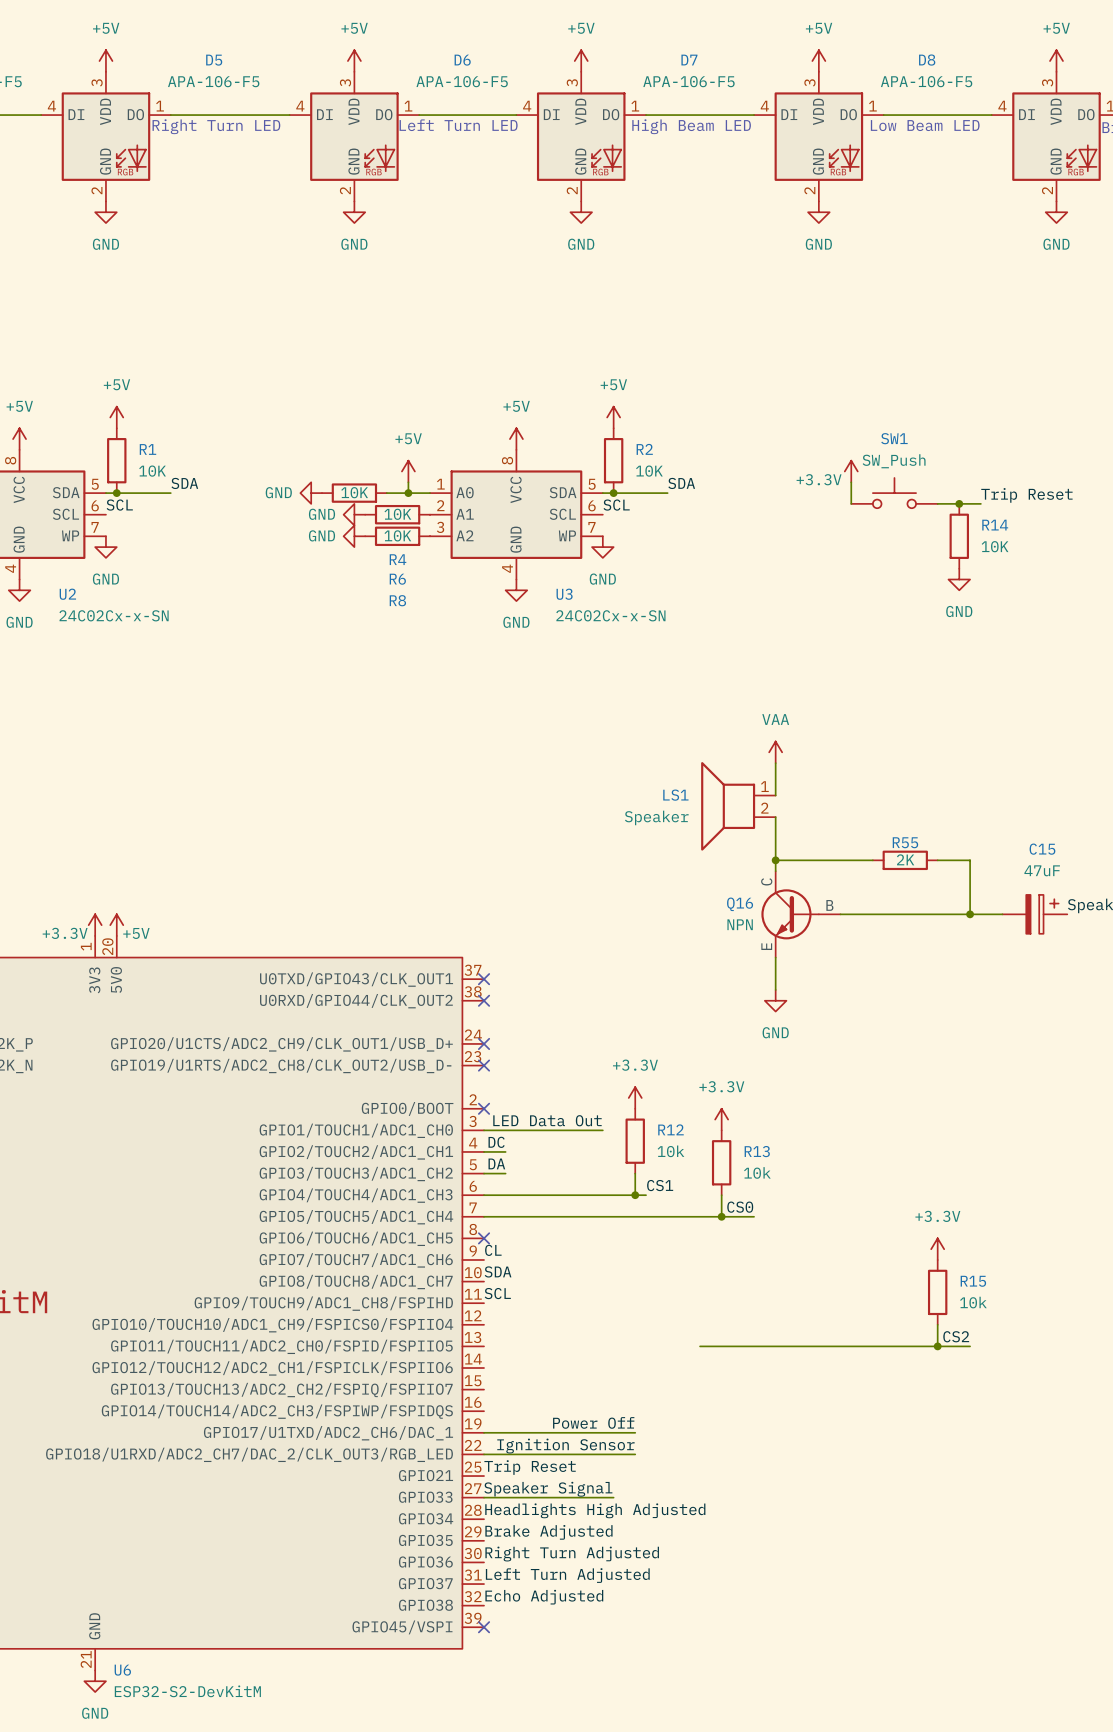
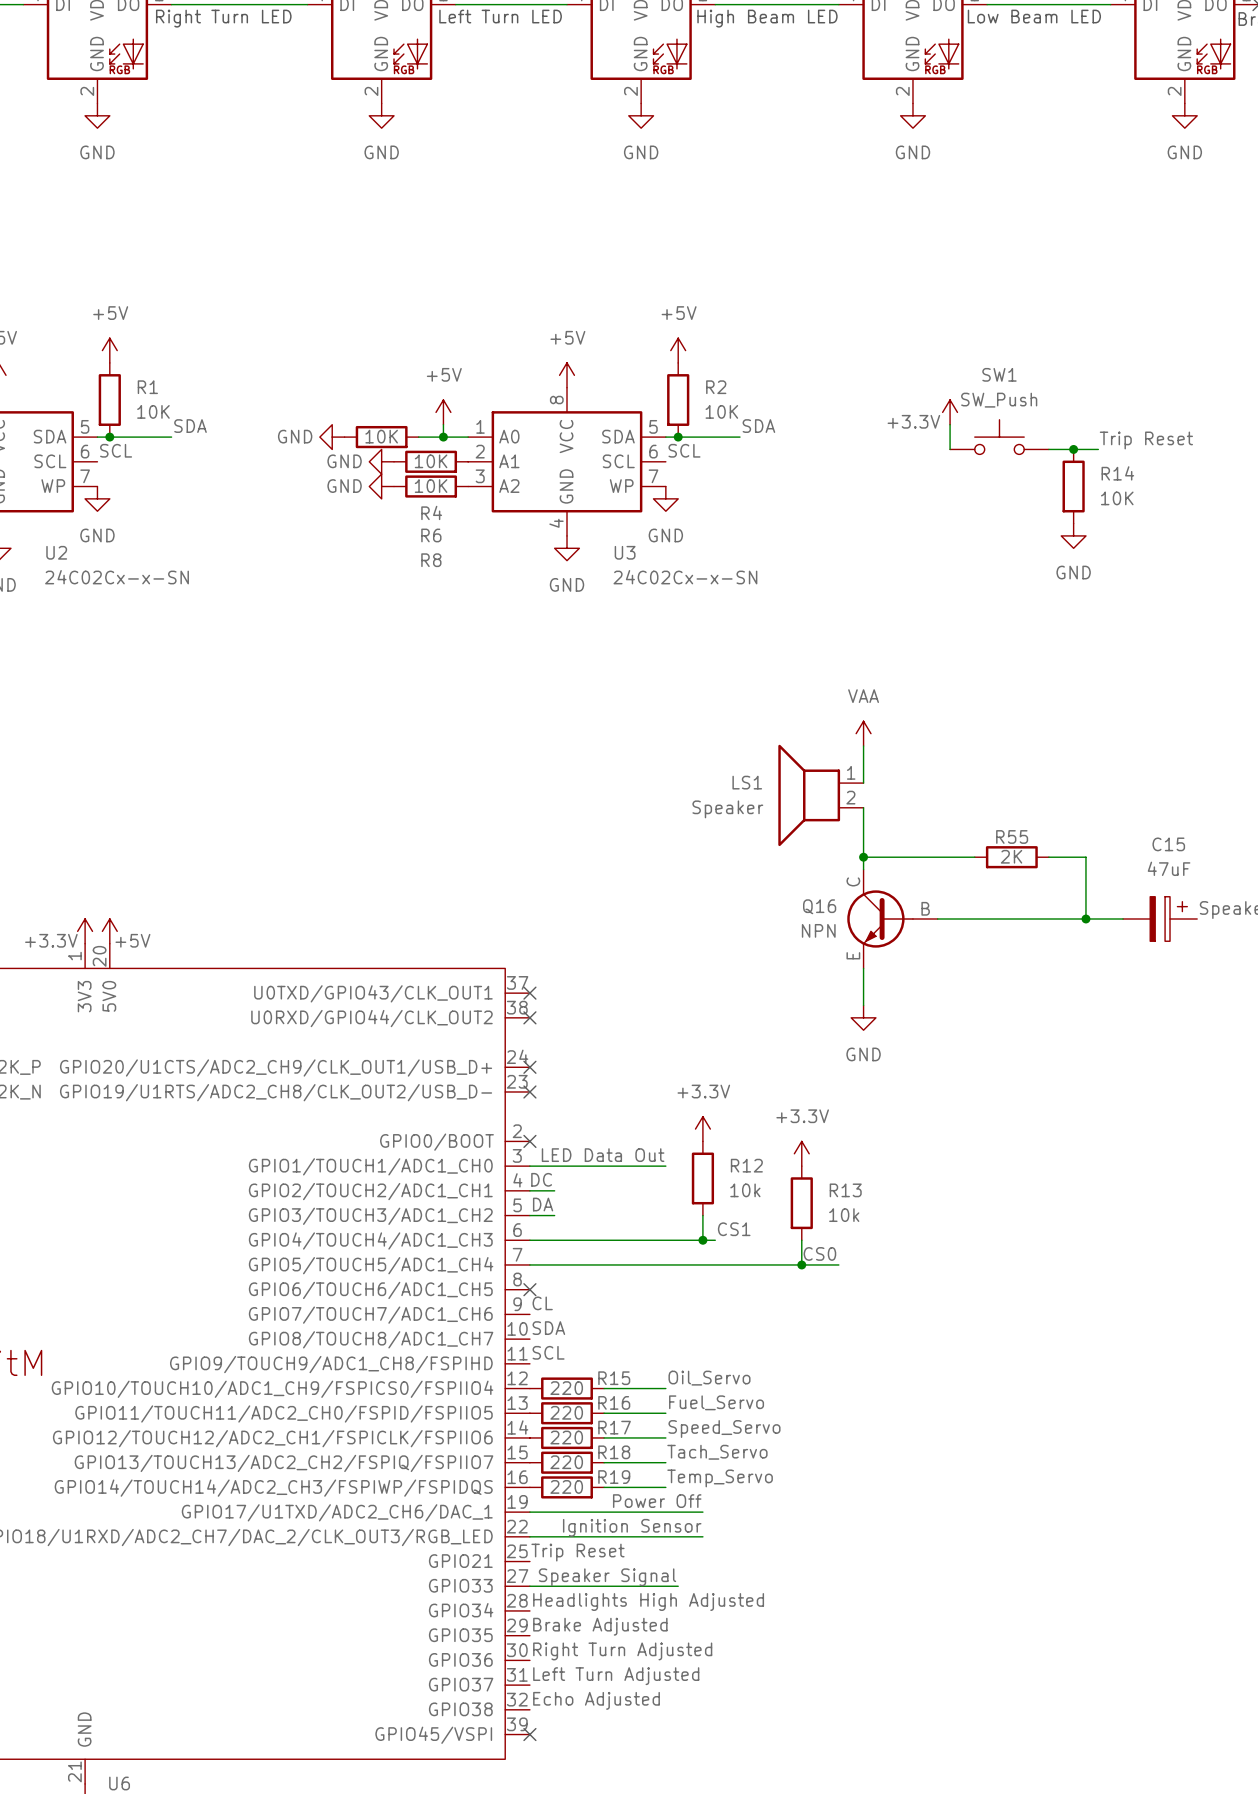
power symbol: +3.3V (937, 1249) -> none
R15 rotation: 0° (937, 1292) -> 90° clockwise (567, 1388)
R15 position: (937, 1292) -> (567, 1388)
R15 value: 10k (973, 1302) -> 220 (566, 1388)
label: none -> Oil_Servo (709, 1378)
wire: none -> (604, 1388) (665, 1388)
wire: (937, 1324) (937, 1346) -> none
label: CS2 (956, 1336) -> none
label: none -> Fuel_Servo (716, 1402)
R16: none -> 220 (567, 1413)
wire: none -> (604, 1413) (665, 1413)
wire: (700, 1346) (970, 1346) -> none
junction: (937, 1346) -> none
label: none -> Speed_Servo (724, 1429)
R17: none -> 220 (567, 1437)
wire: none -> (604, 1437) (665, 1437)
label: none -> Tach_Servo (717, 1452)
R18: none -> 220 (567, 1462)
wire: none -> (604, 1462) (665, 1462)
label: none -> Temp_Servo (720, 1478)
R19: none -> 220 (567, 1487)
wire: none -> (604, 1487) (665, 1487)

